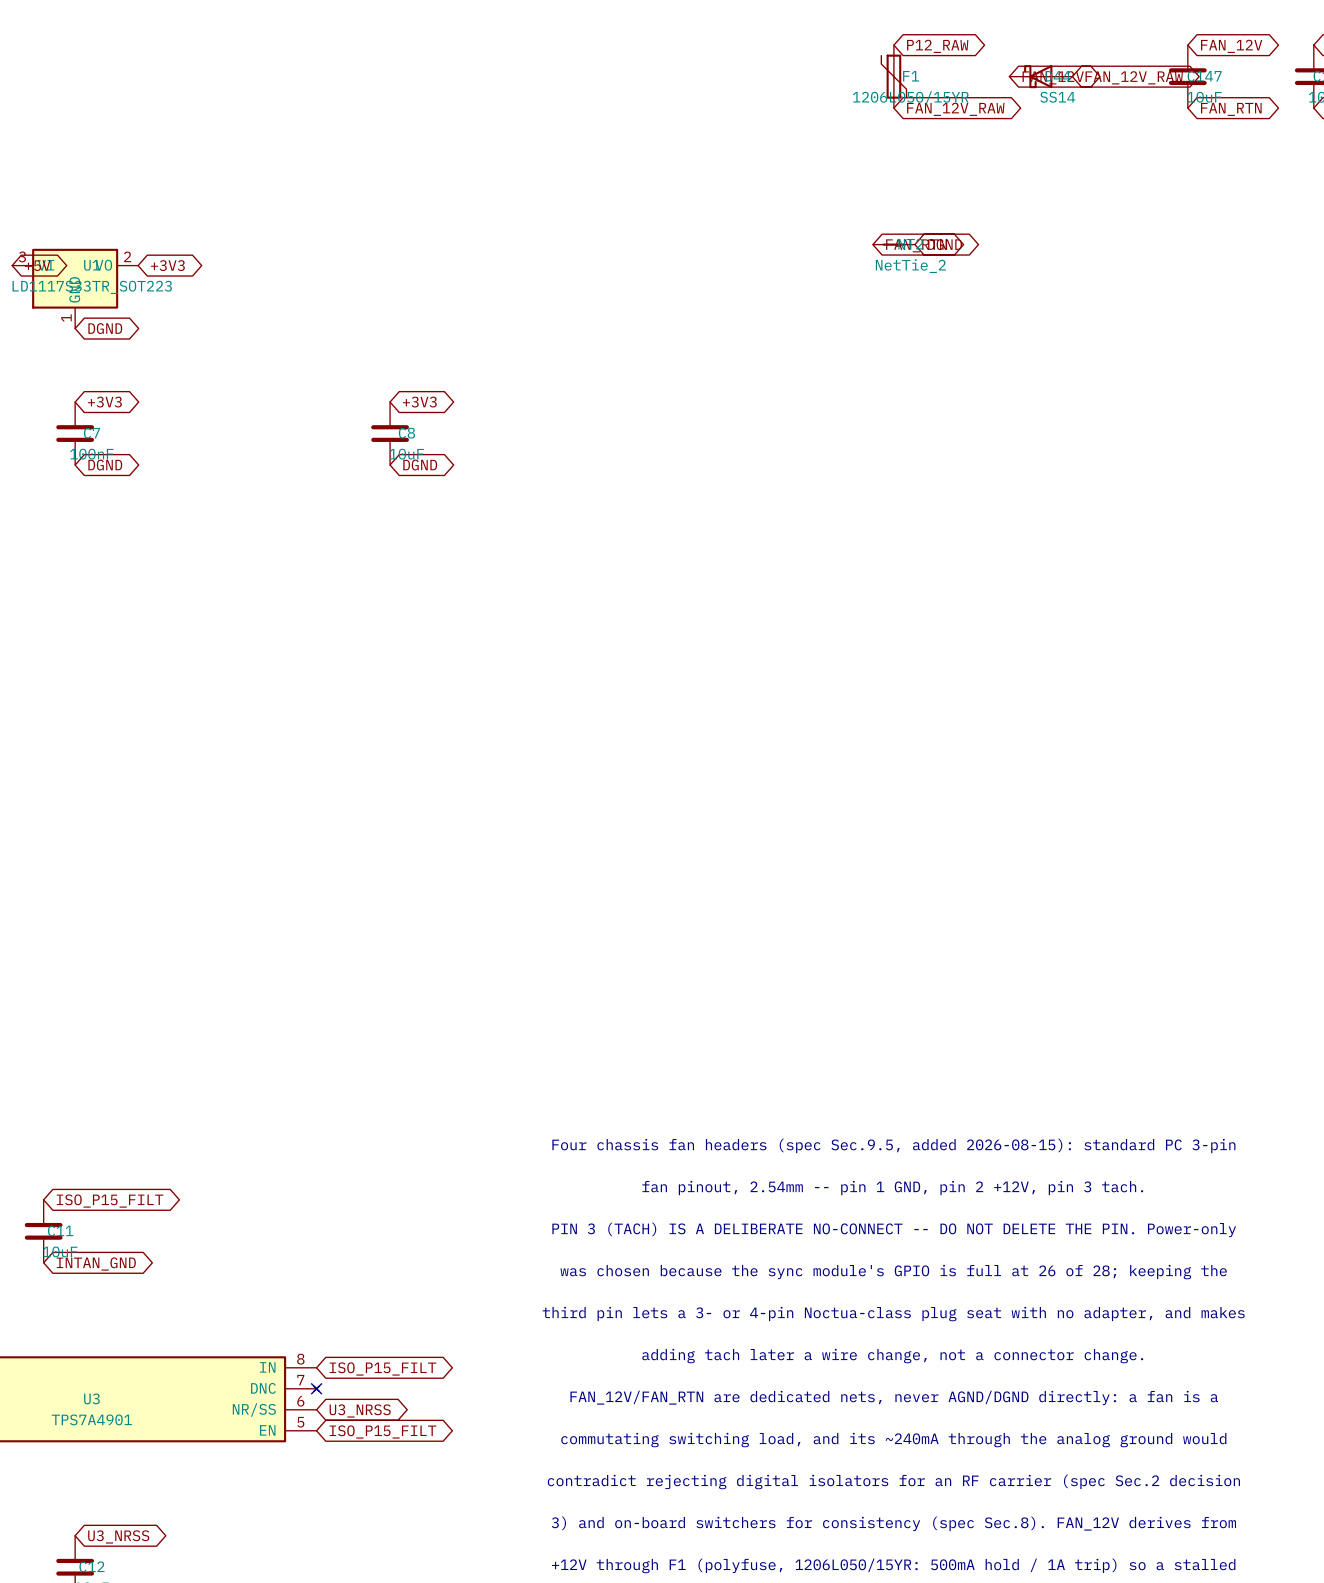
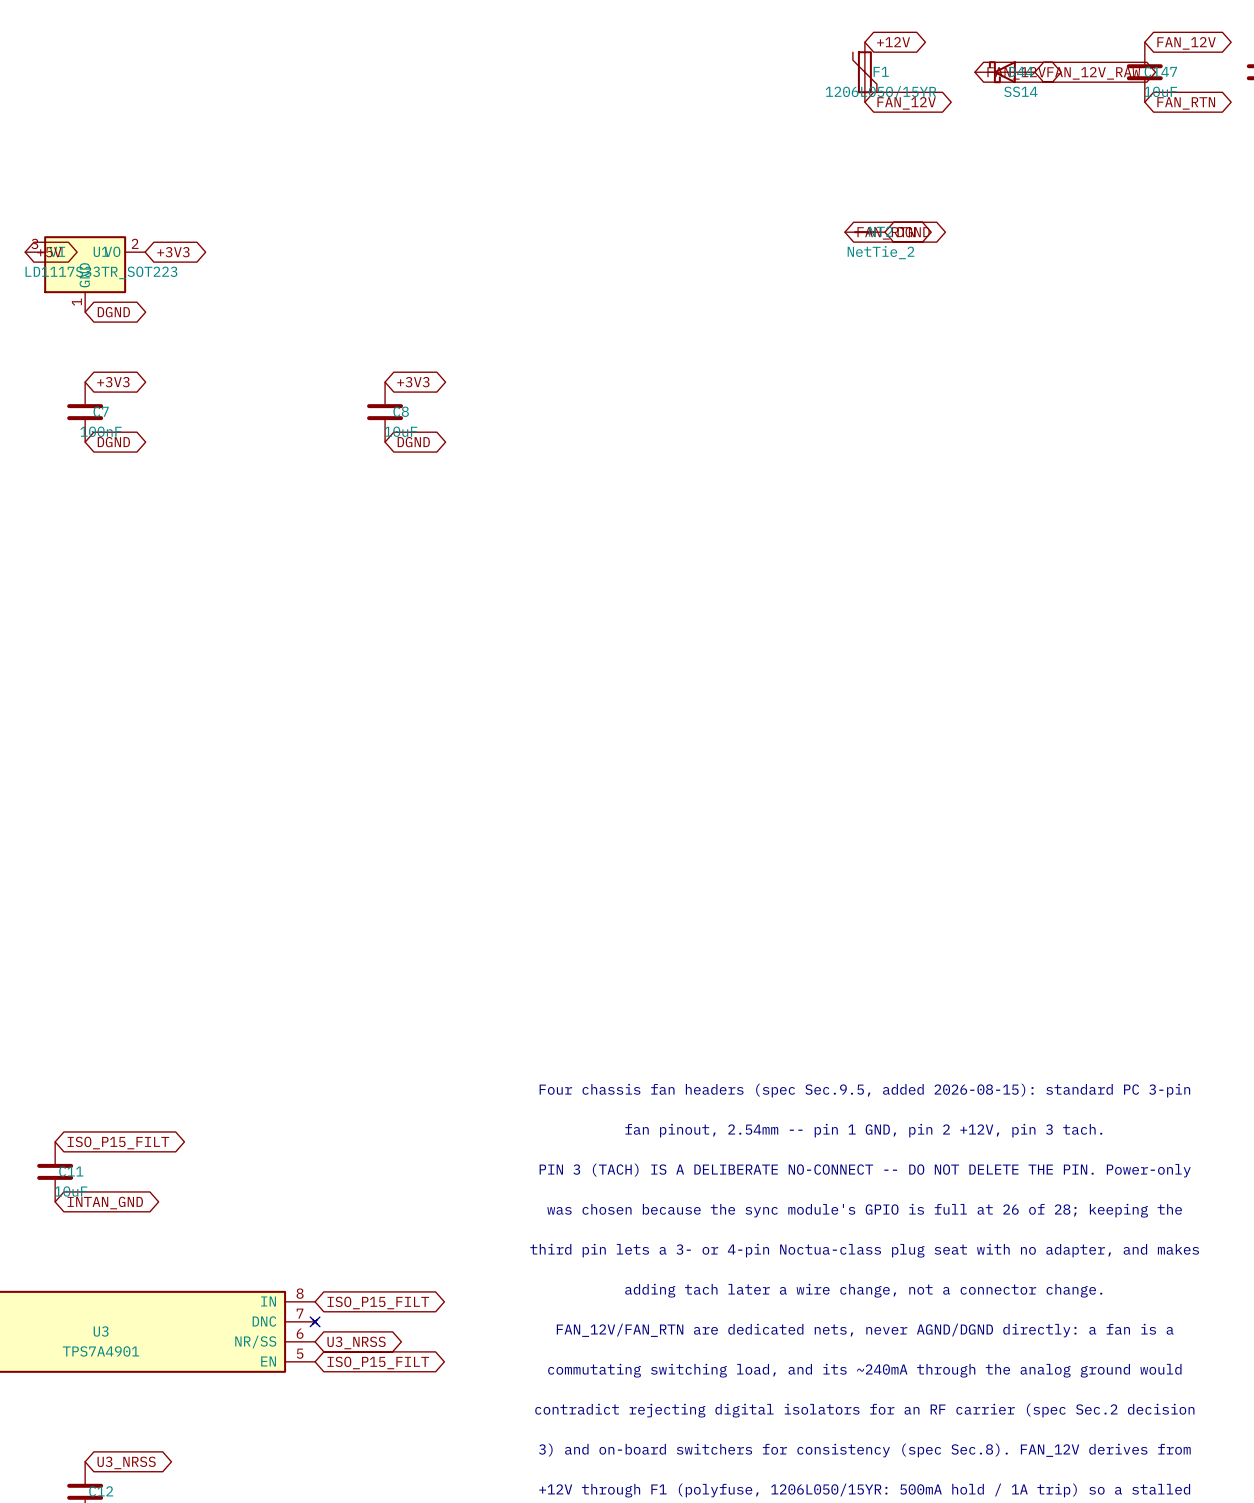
global label: P12_RAW (937, 46) -> +12V (893, 42)
global label: FAN_12V_RAW (955, 109) -> FAN_12V (906, 103)

